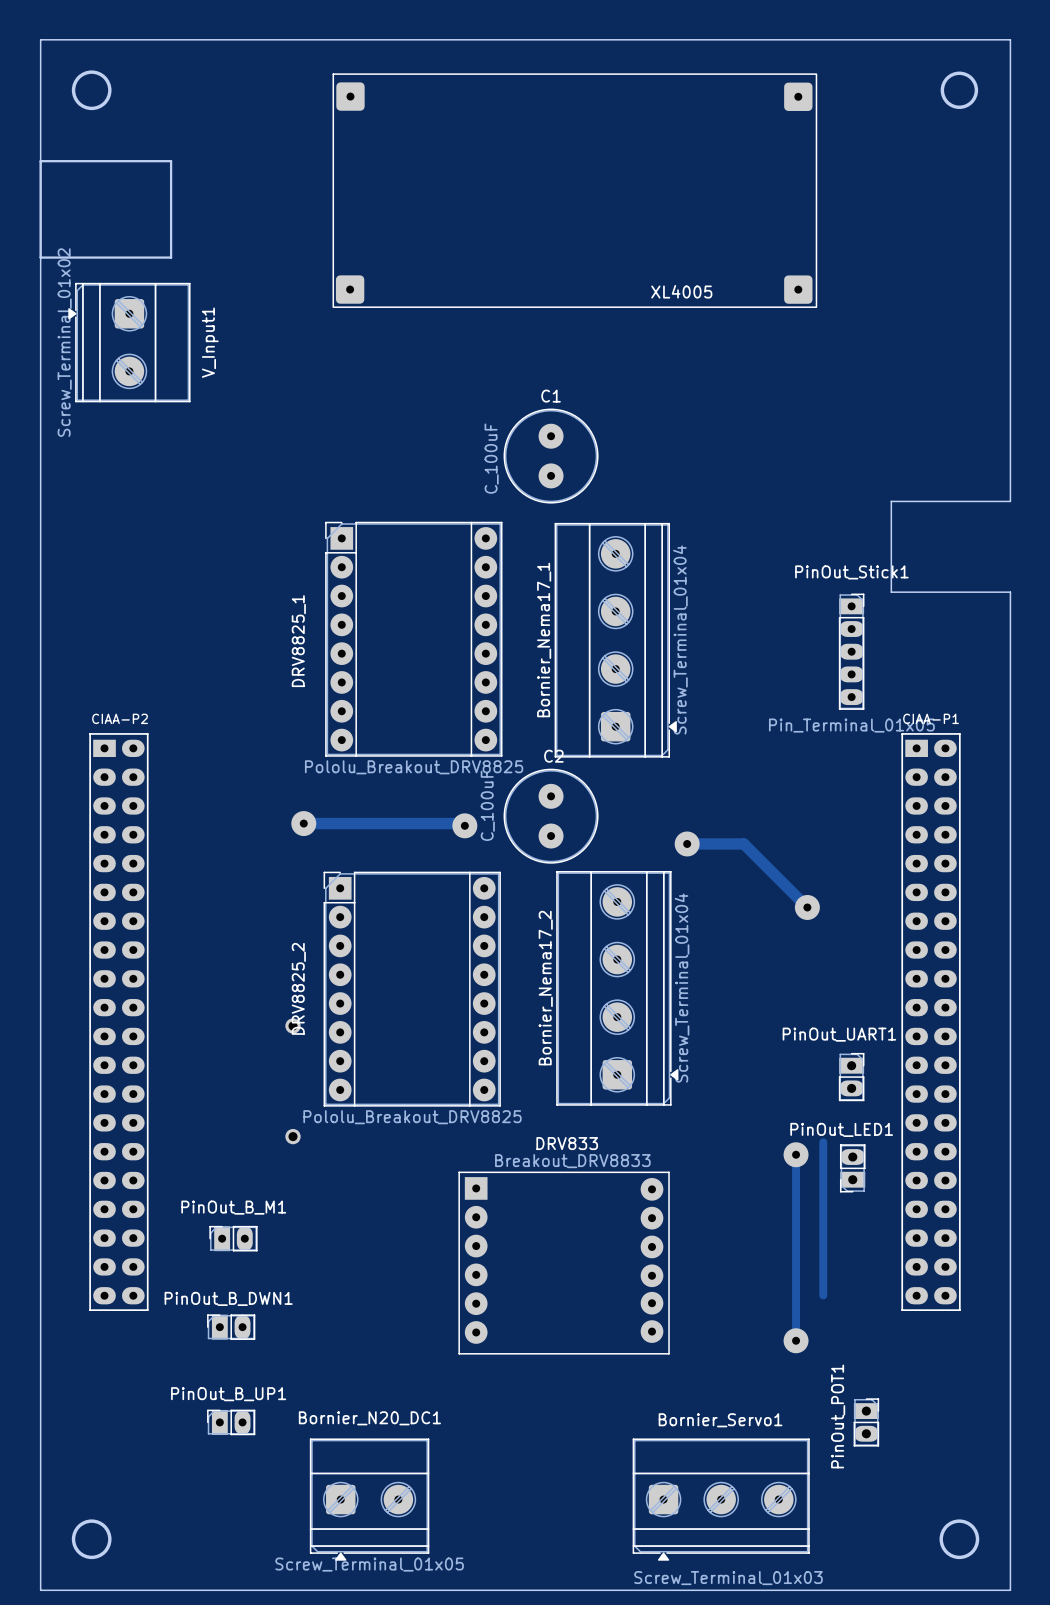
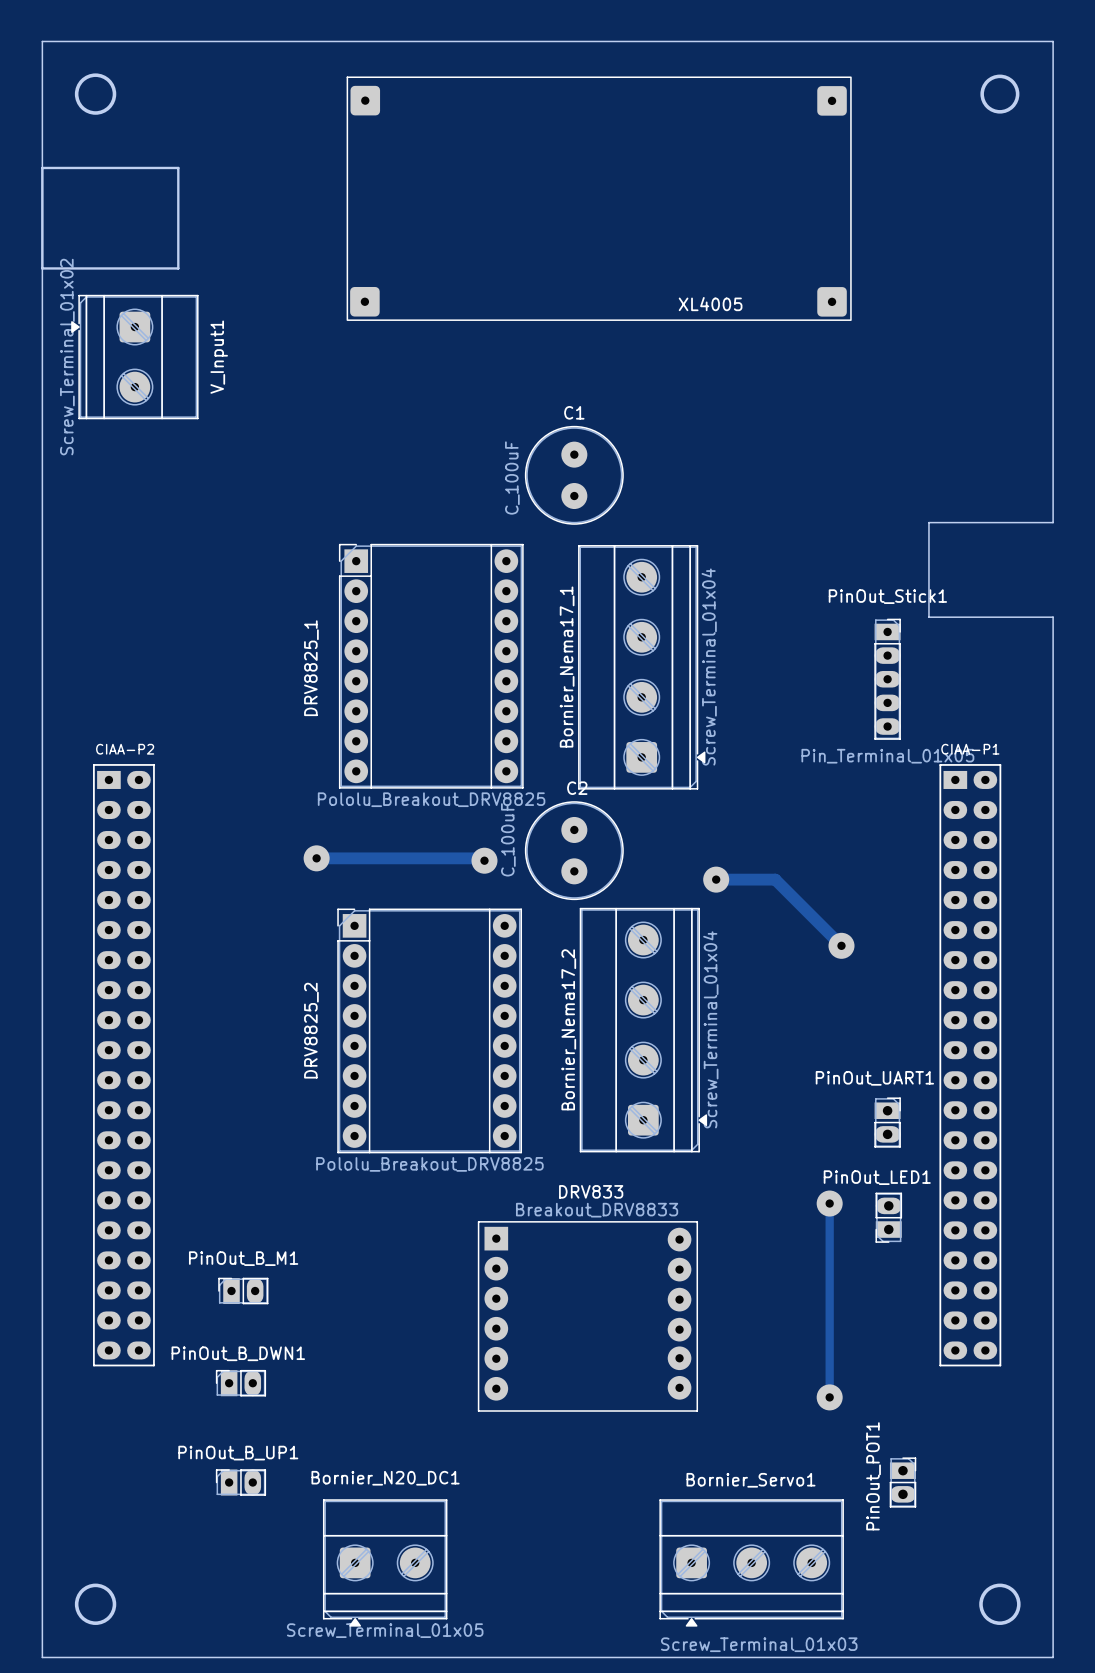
part: (293, 1026) -> none
part: (293, 1136) -> none
track: (823, 1142) (823, 1295) -> none

